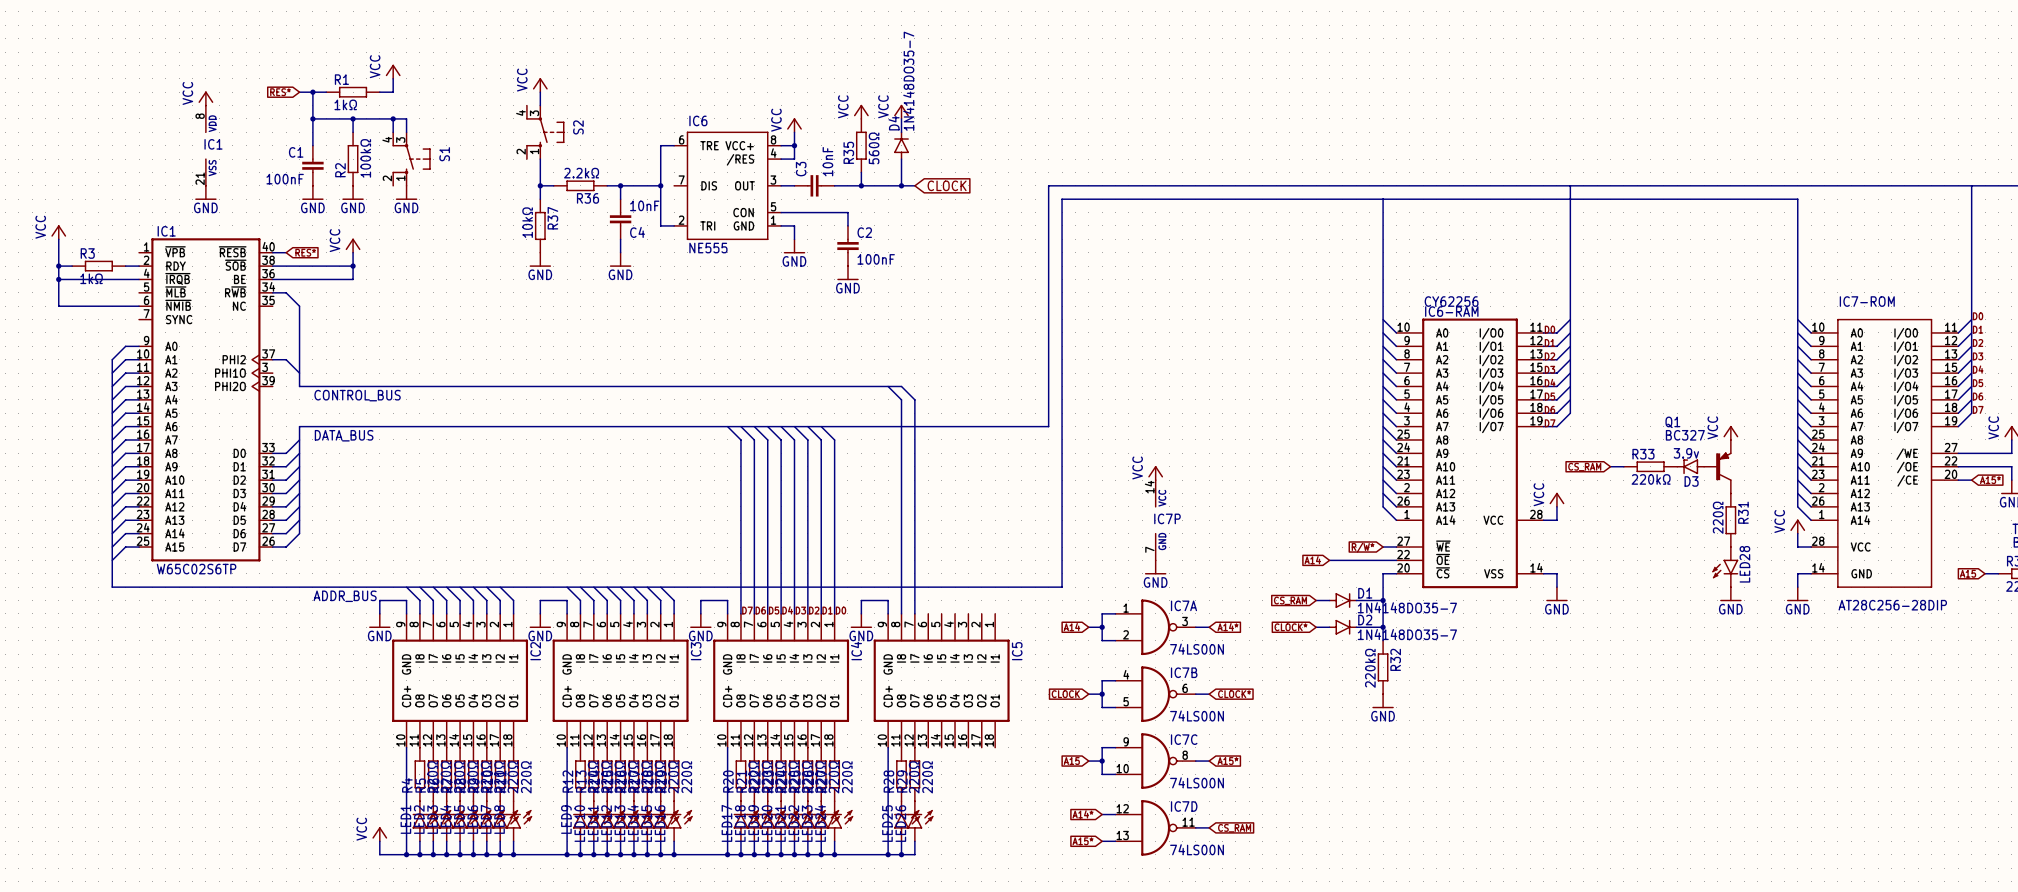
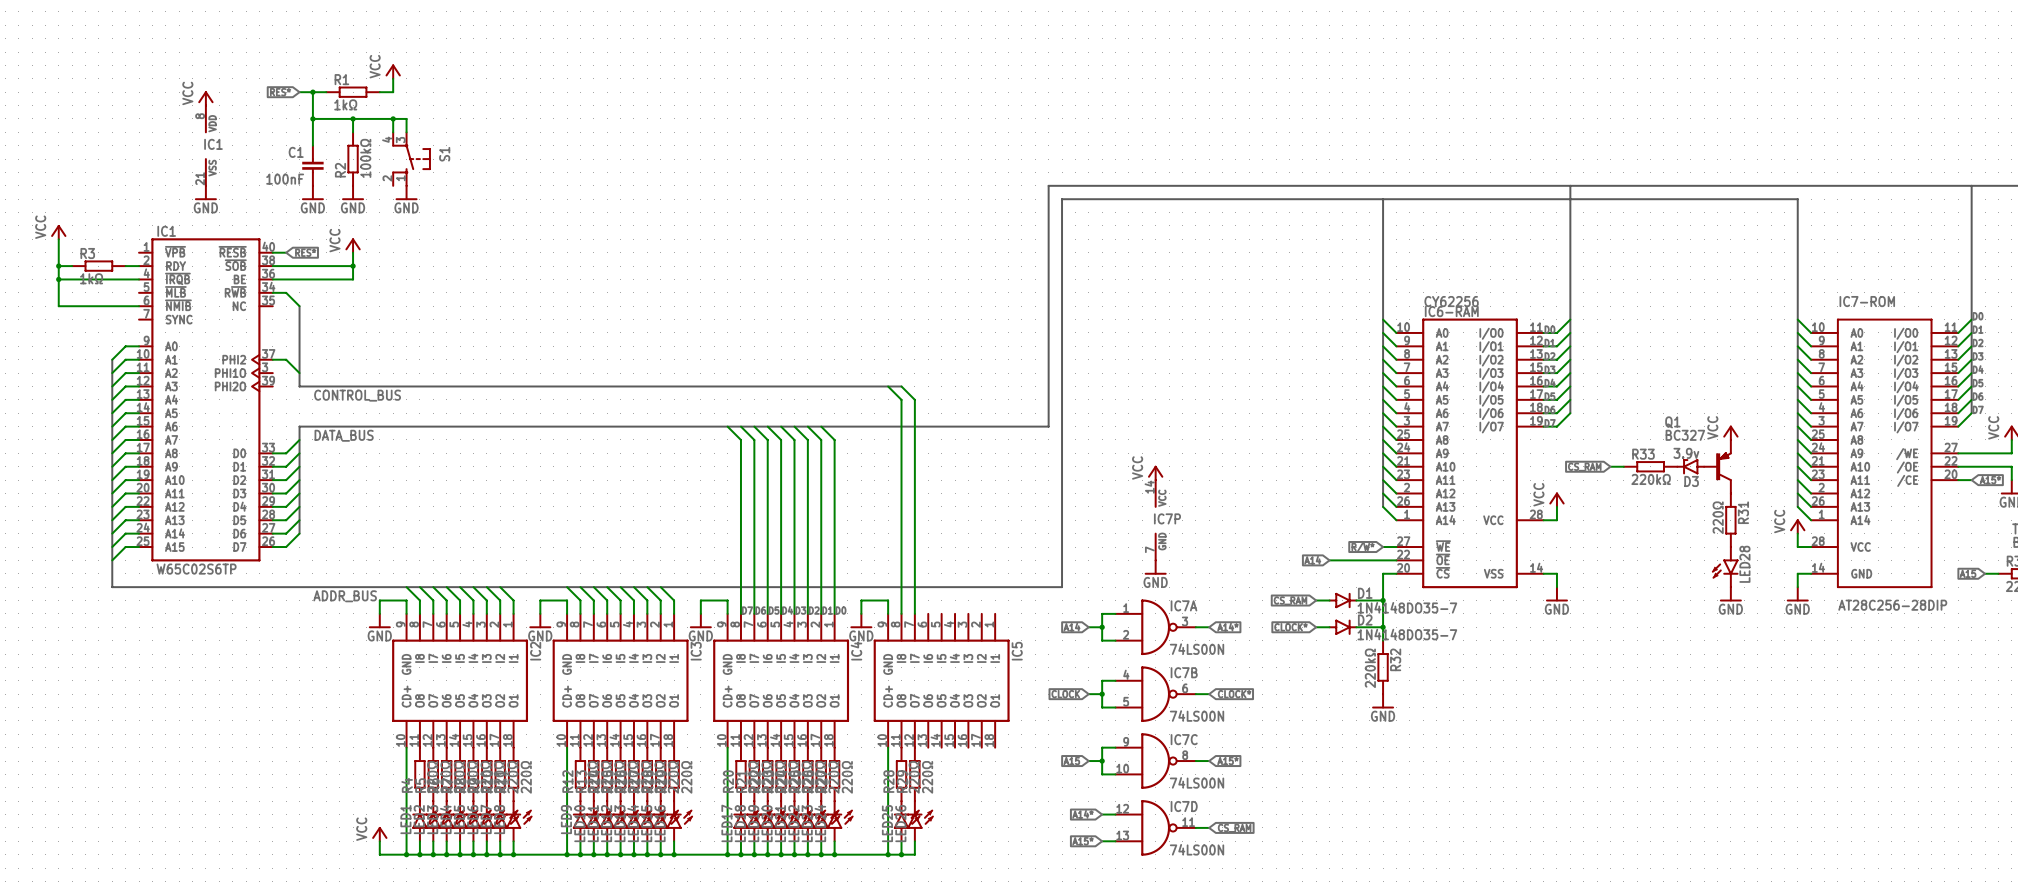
power symbol: VCC (540, 85) -> none
wire: (540, 92) (540, 105) -> none
power symbol: VCC (861, 111) -> none
power symbol: VCC (901, 111) -> none
wire: (901, 118) (901, 132) -> none
power symbol: VCC (794, 125) -> none
S2: (545, 132) -> none
wire: (794, 132) (794, 159) (781, 159) -> none
wire: (674, 145) (660, 145) (660, 225) (674, 225) -> none
wire: (781, 145) (794, 145) -> none
junction: (794, 145) -> none
R35: 560Ω (861, 145) -> none
D4: 1N4148DO35-7 (901, 145) -> none
wire: (540, 159) (540, 199) -> none
wire: (901, 159) (901, 185) -> none
wire: (861, 172) (861, 185) -> none
wire: (540, 185) (553, 185) -> none
junction: (540, 185) -> none
R36: 2.2kΩ (580, 185) -> none
wire: (607, 185) (660, 185) -> none
wire: (620, 185) (620, 199) -> none
junction: (620, 185) -> none
junction: (660, 185) -> none
IC6: NE555 (727, 185) -> none
wire: (781, 185) (794, 185) -> none
C3: 10nF (814, 185) -> none
wire: (834, 185) (914, 185) -> none
junction: (861, 185) -> none
junction: (901, 185) -> none
global label: CLOCK (947, 185) -> none
wire: (781, 212) (847, 212) (847, 225) -> none
C4: 10nF (620, 219) -> none
R37: 10kΩ (540, 225) -> none
wire: (781, 225) (794, 225) (794, 239) -> none
wire: (620, 239) (620, 252) -> none
power symbol: GND (794, 246) -> none
C2: 100nF (847, 246) -> none
power symbol: GND (540, 259) -> none
power symbol: GND (620, 259) -> none
power symbol: GND (847, 273) -> none

